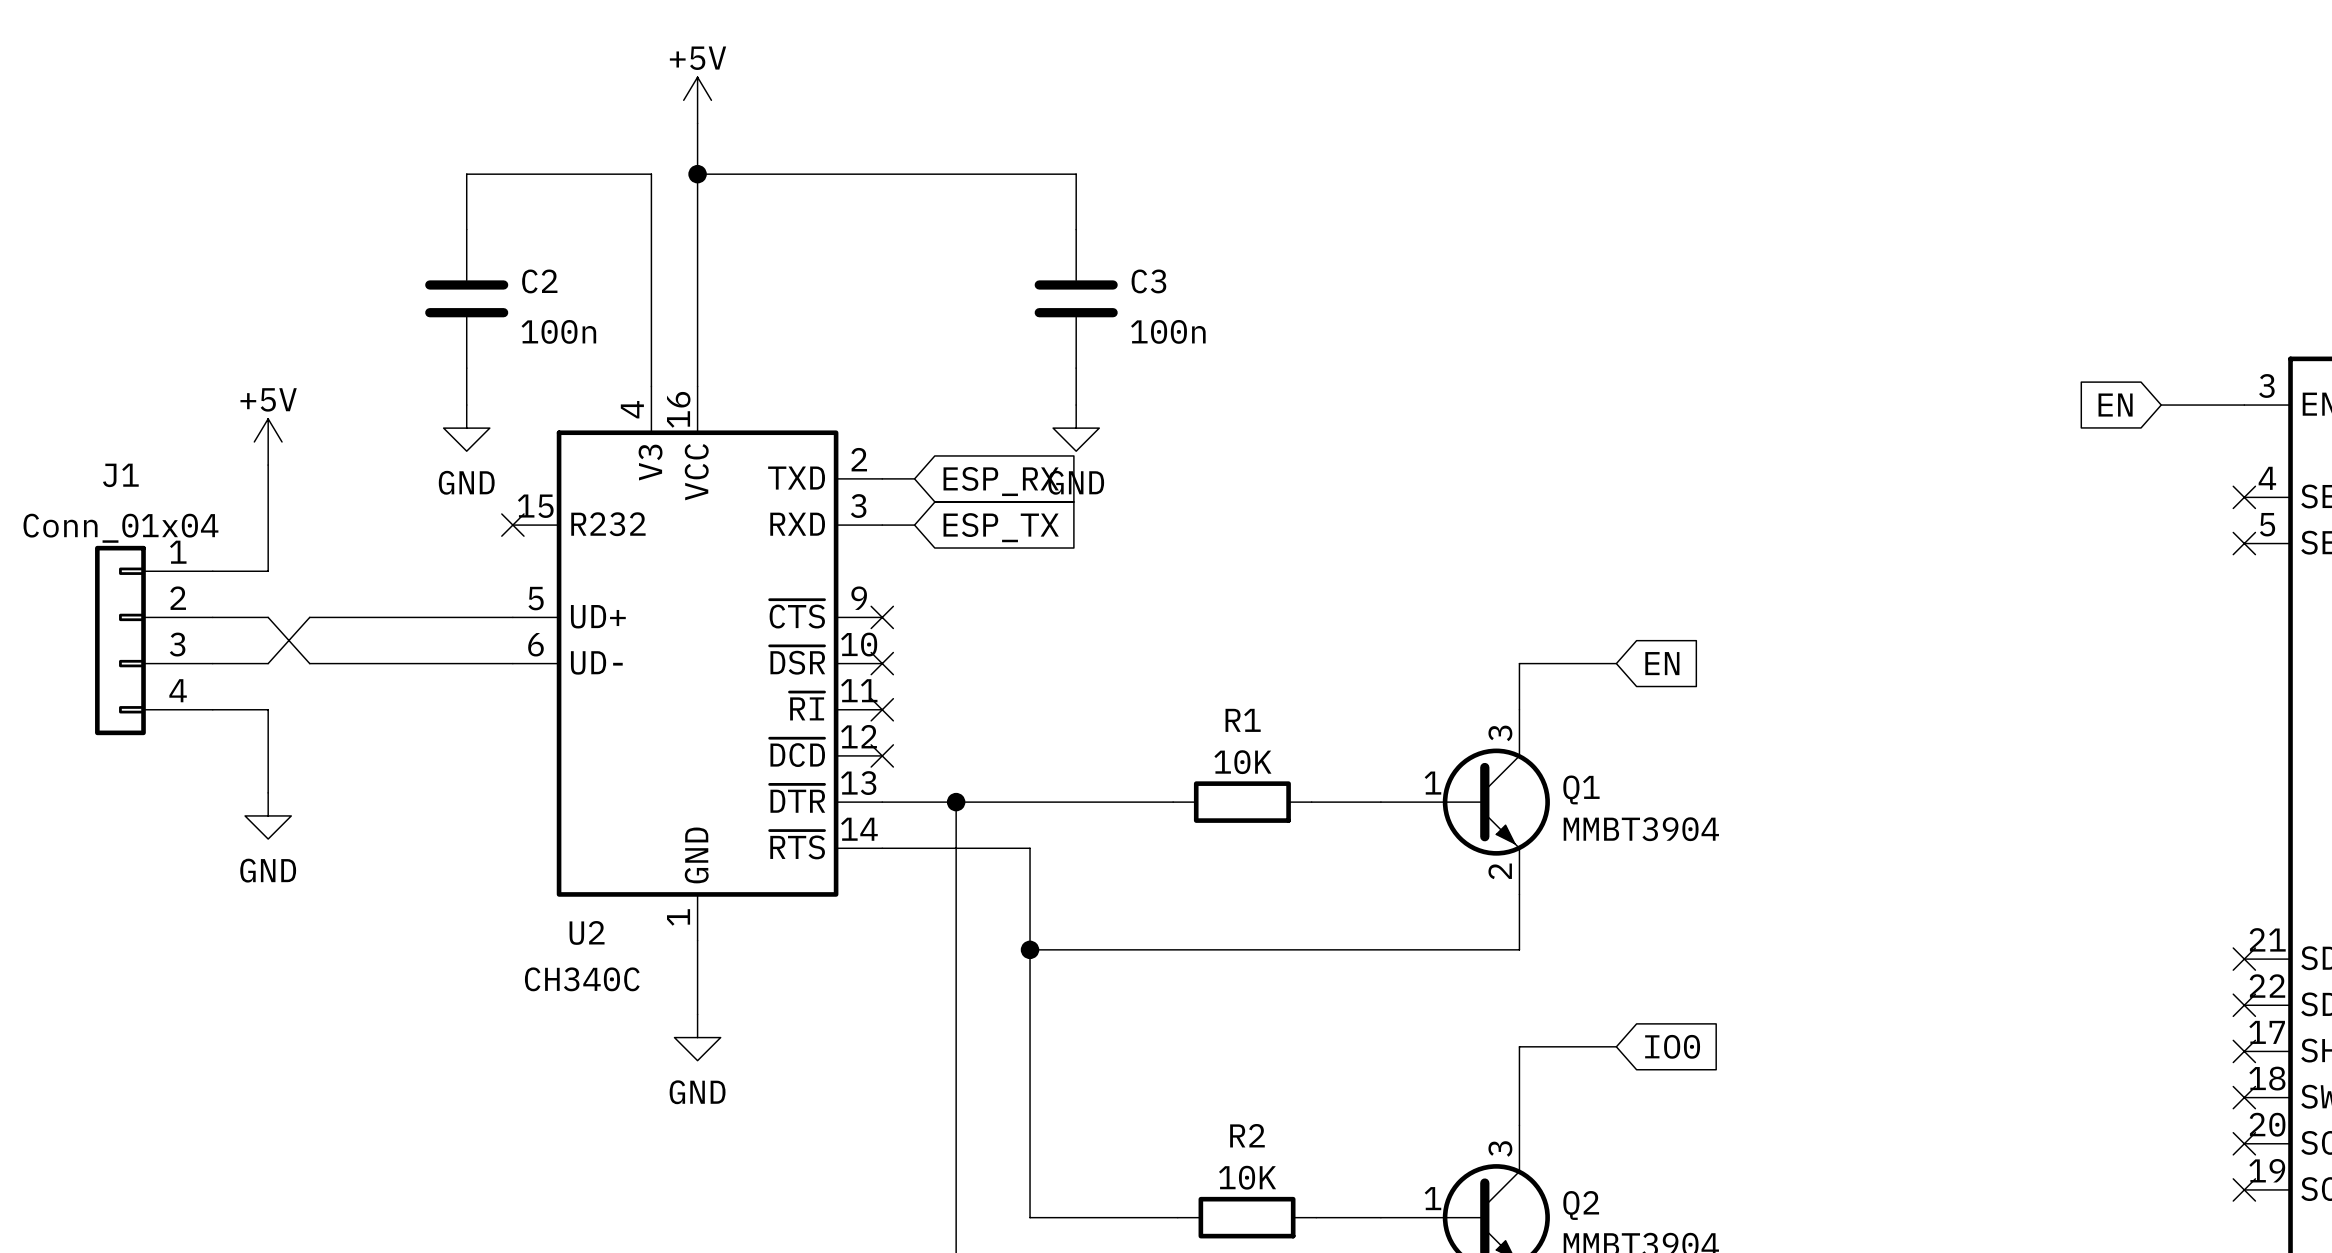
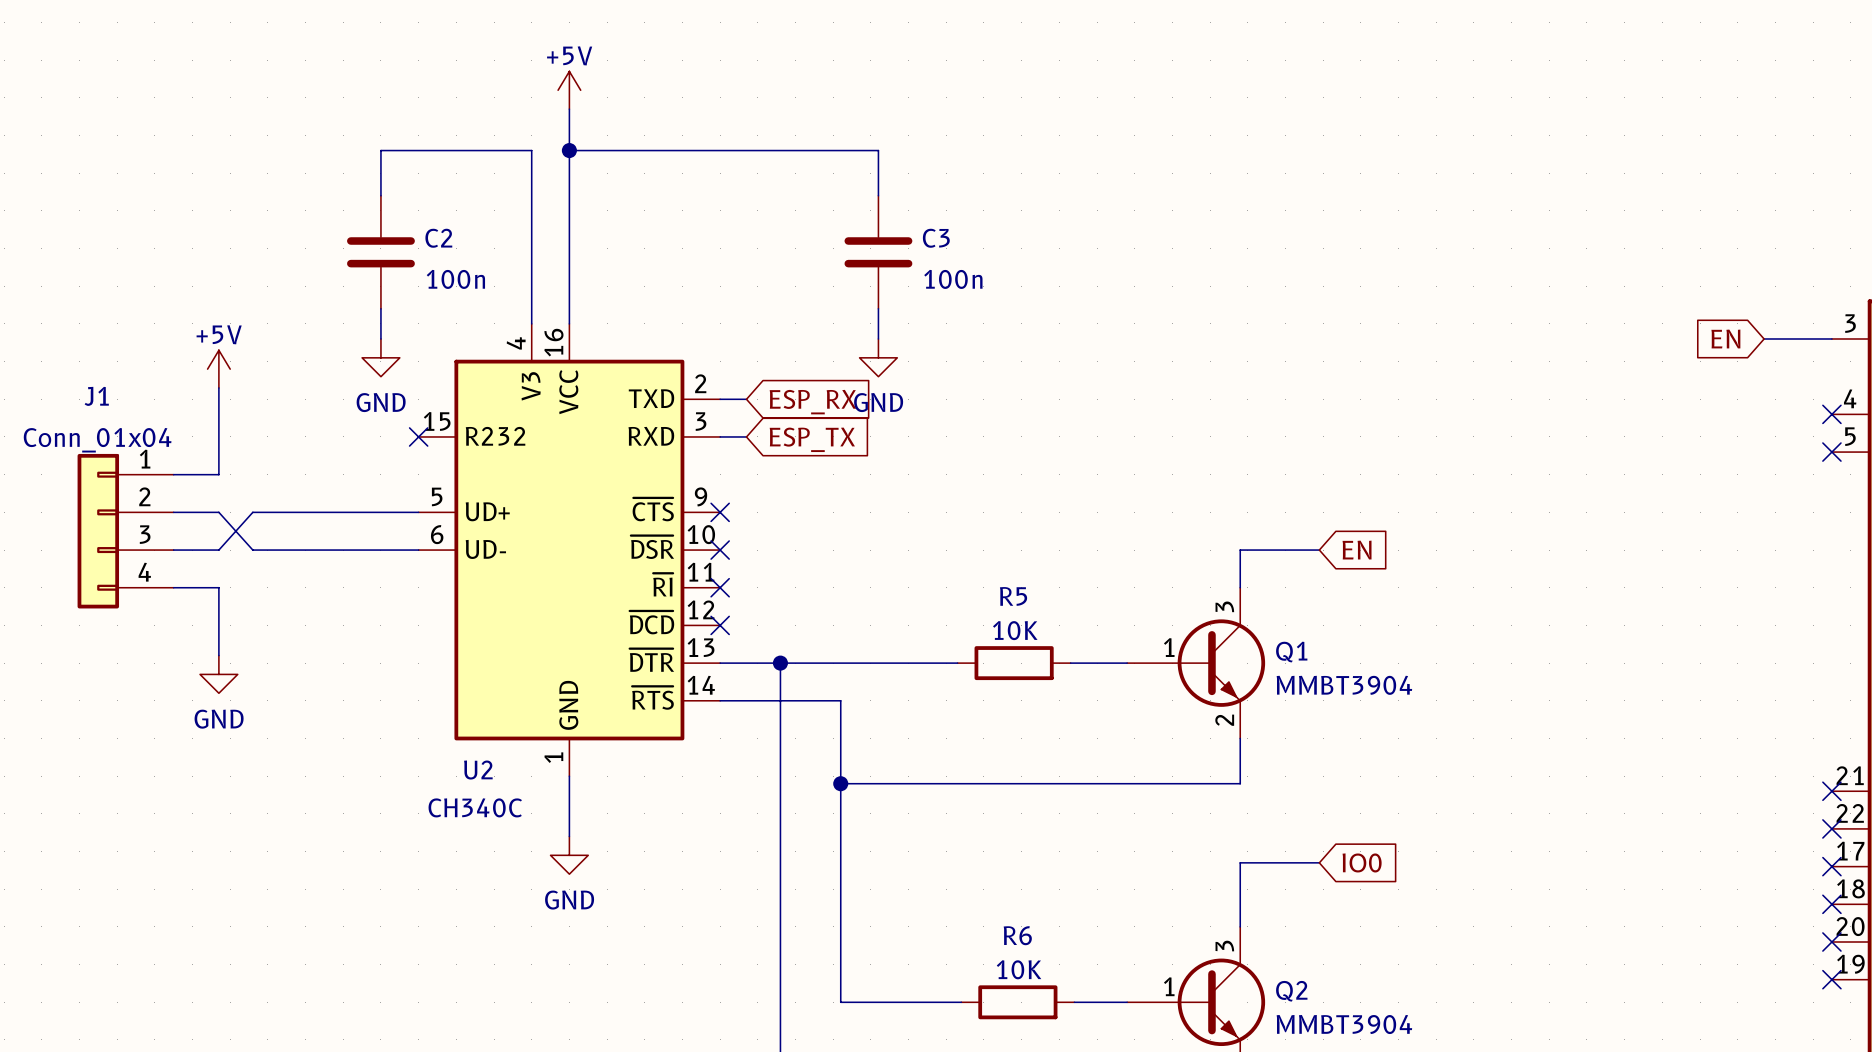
R1 name: R1 (1243, 720) -> R5 (1013, 596)
R2 name: R2 (1247, 1135) -> R6 (1017, 935)

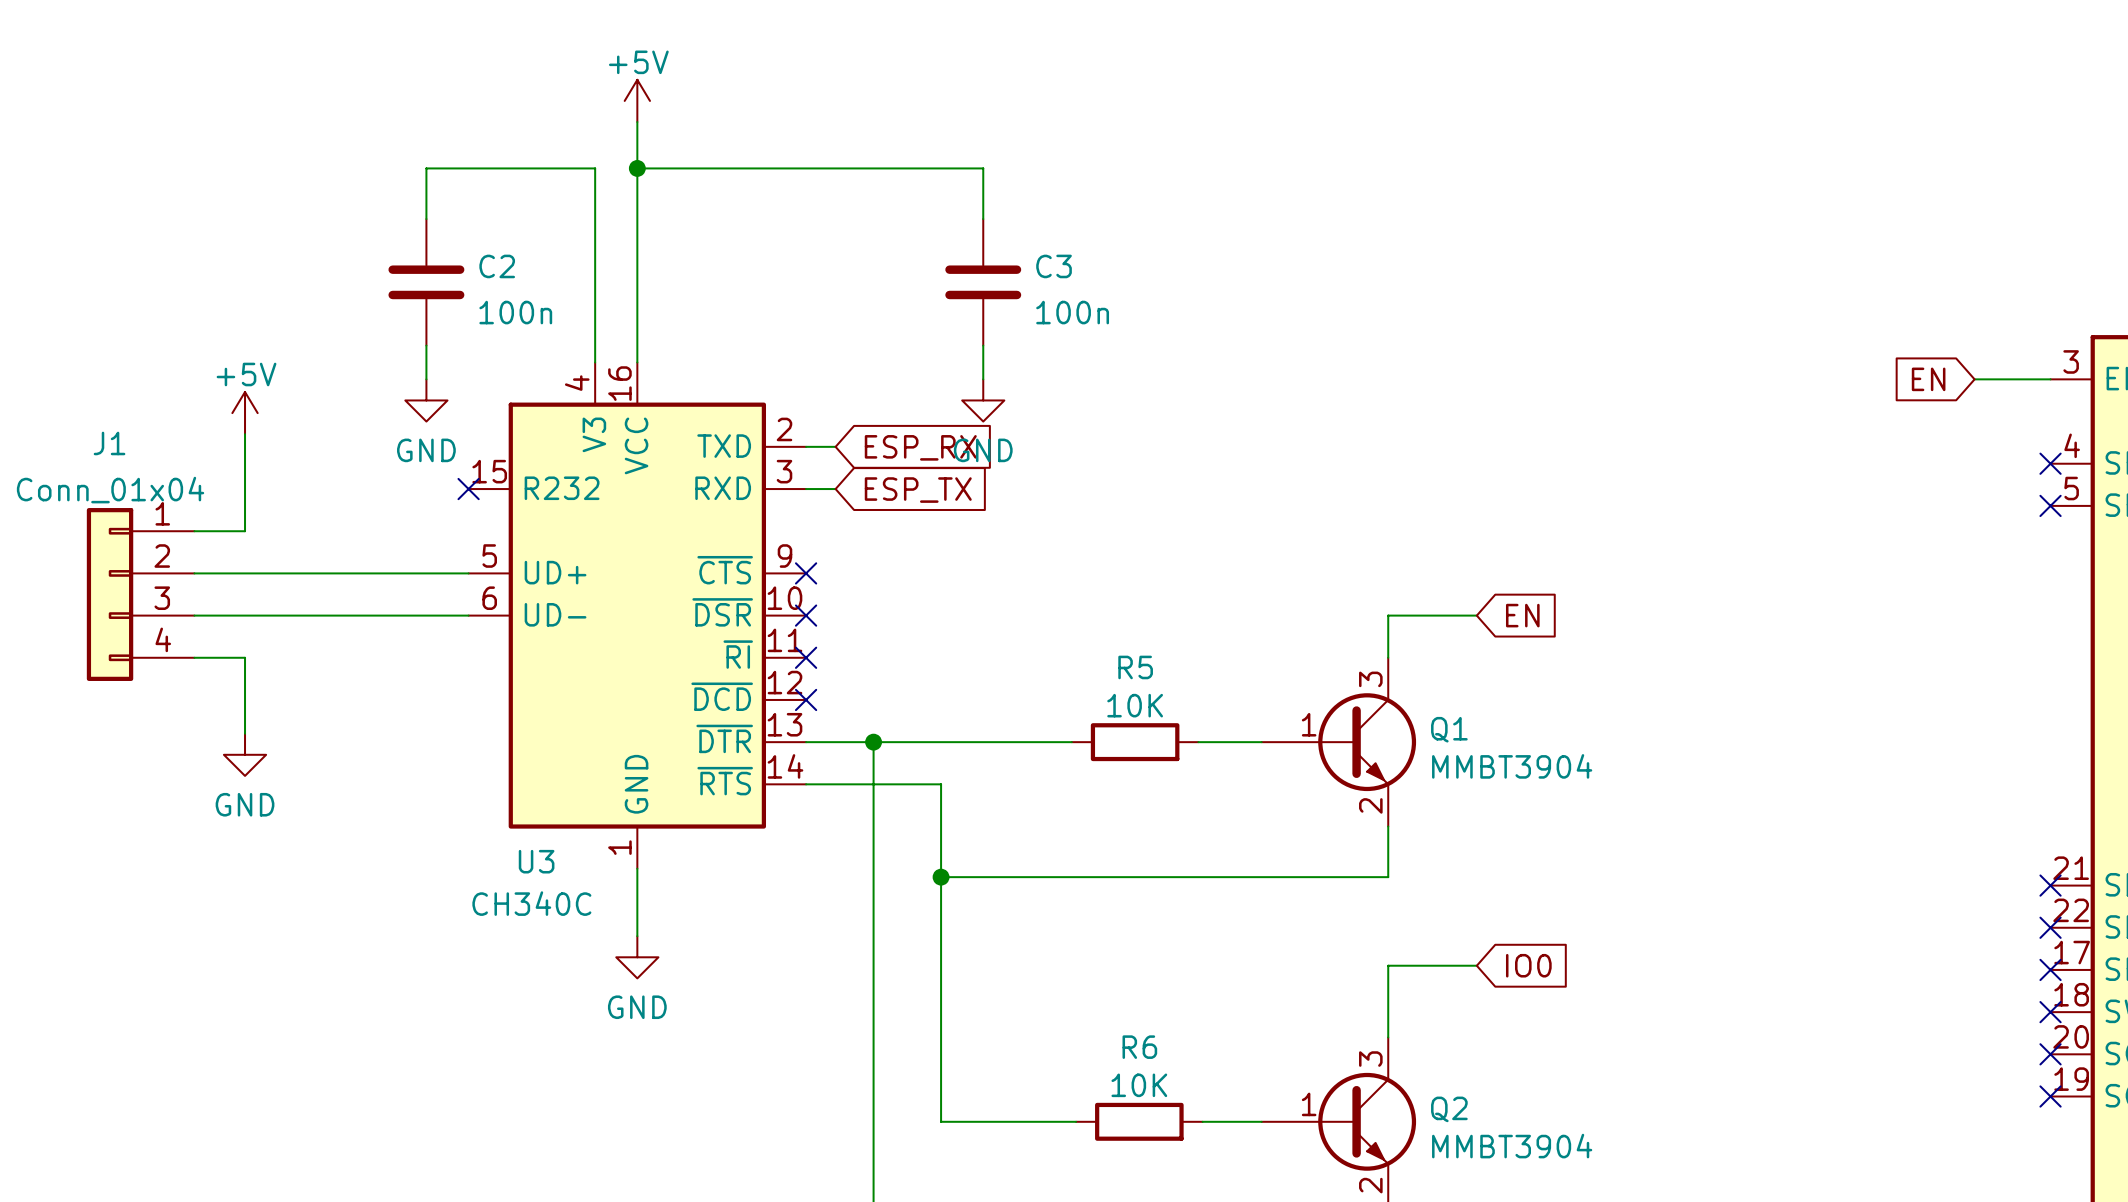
wire: (218, 512) (252, 550) -> (245, 573) (282, 573)
wire: (252, 512) (218, 550) -> (282, 615) (245, 615)
U2 name: U2 (478, 770) -> U3 (536, 861)

